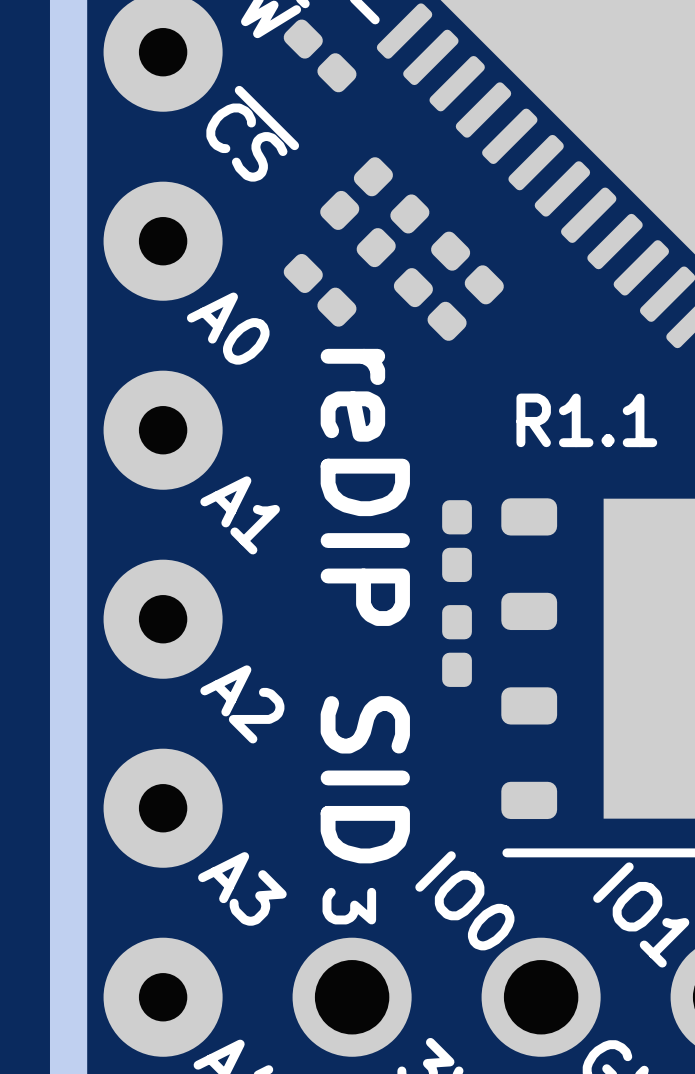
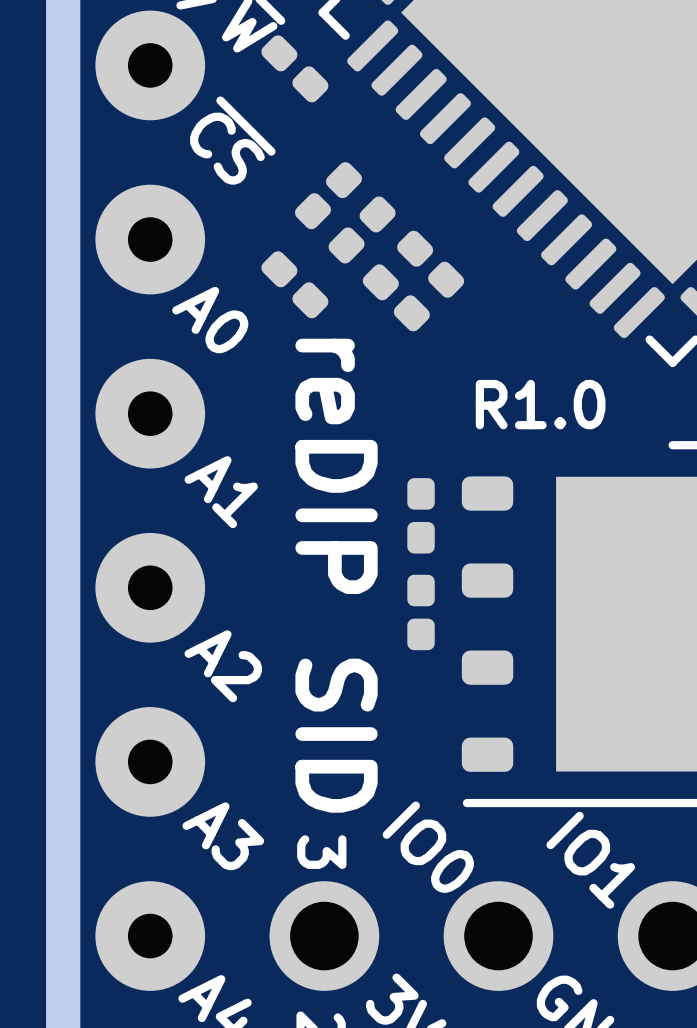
text: R1.1 (586, 420) -> R1.0 (540, 404)

